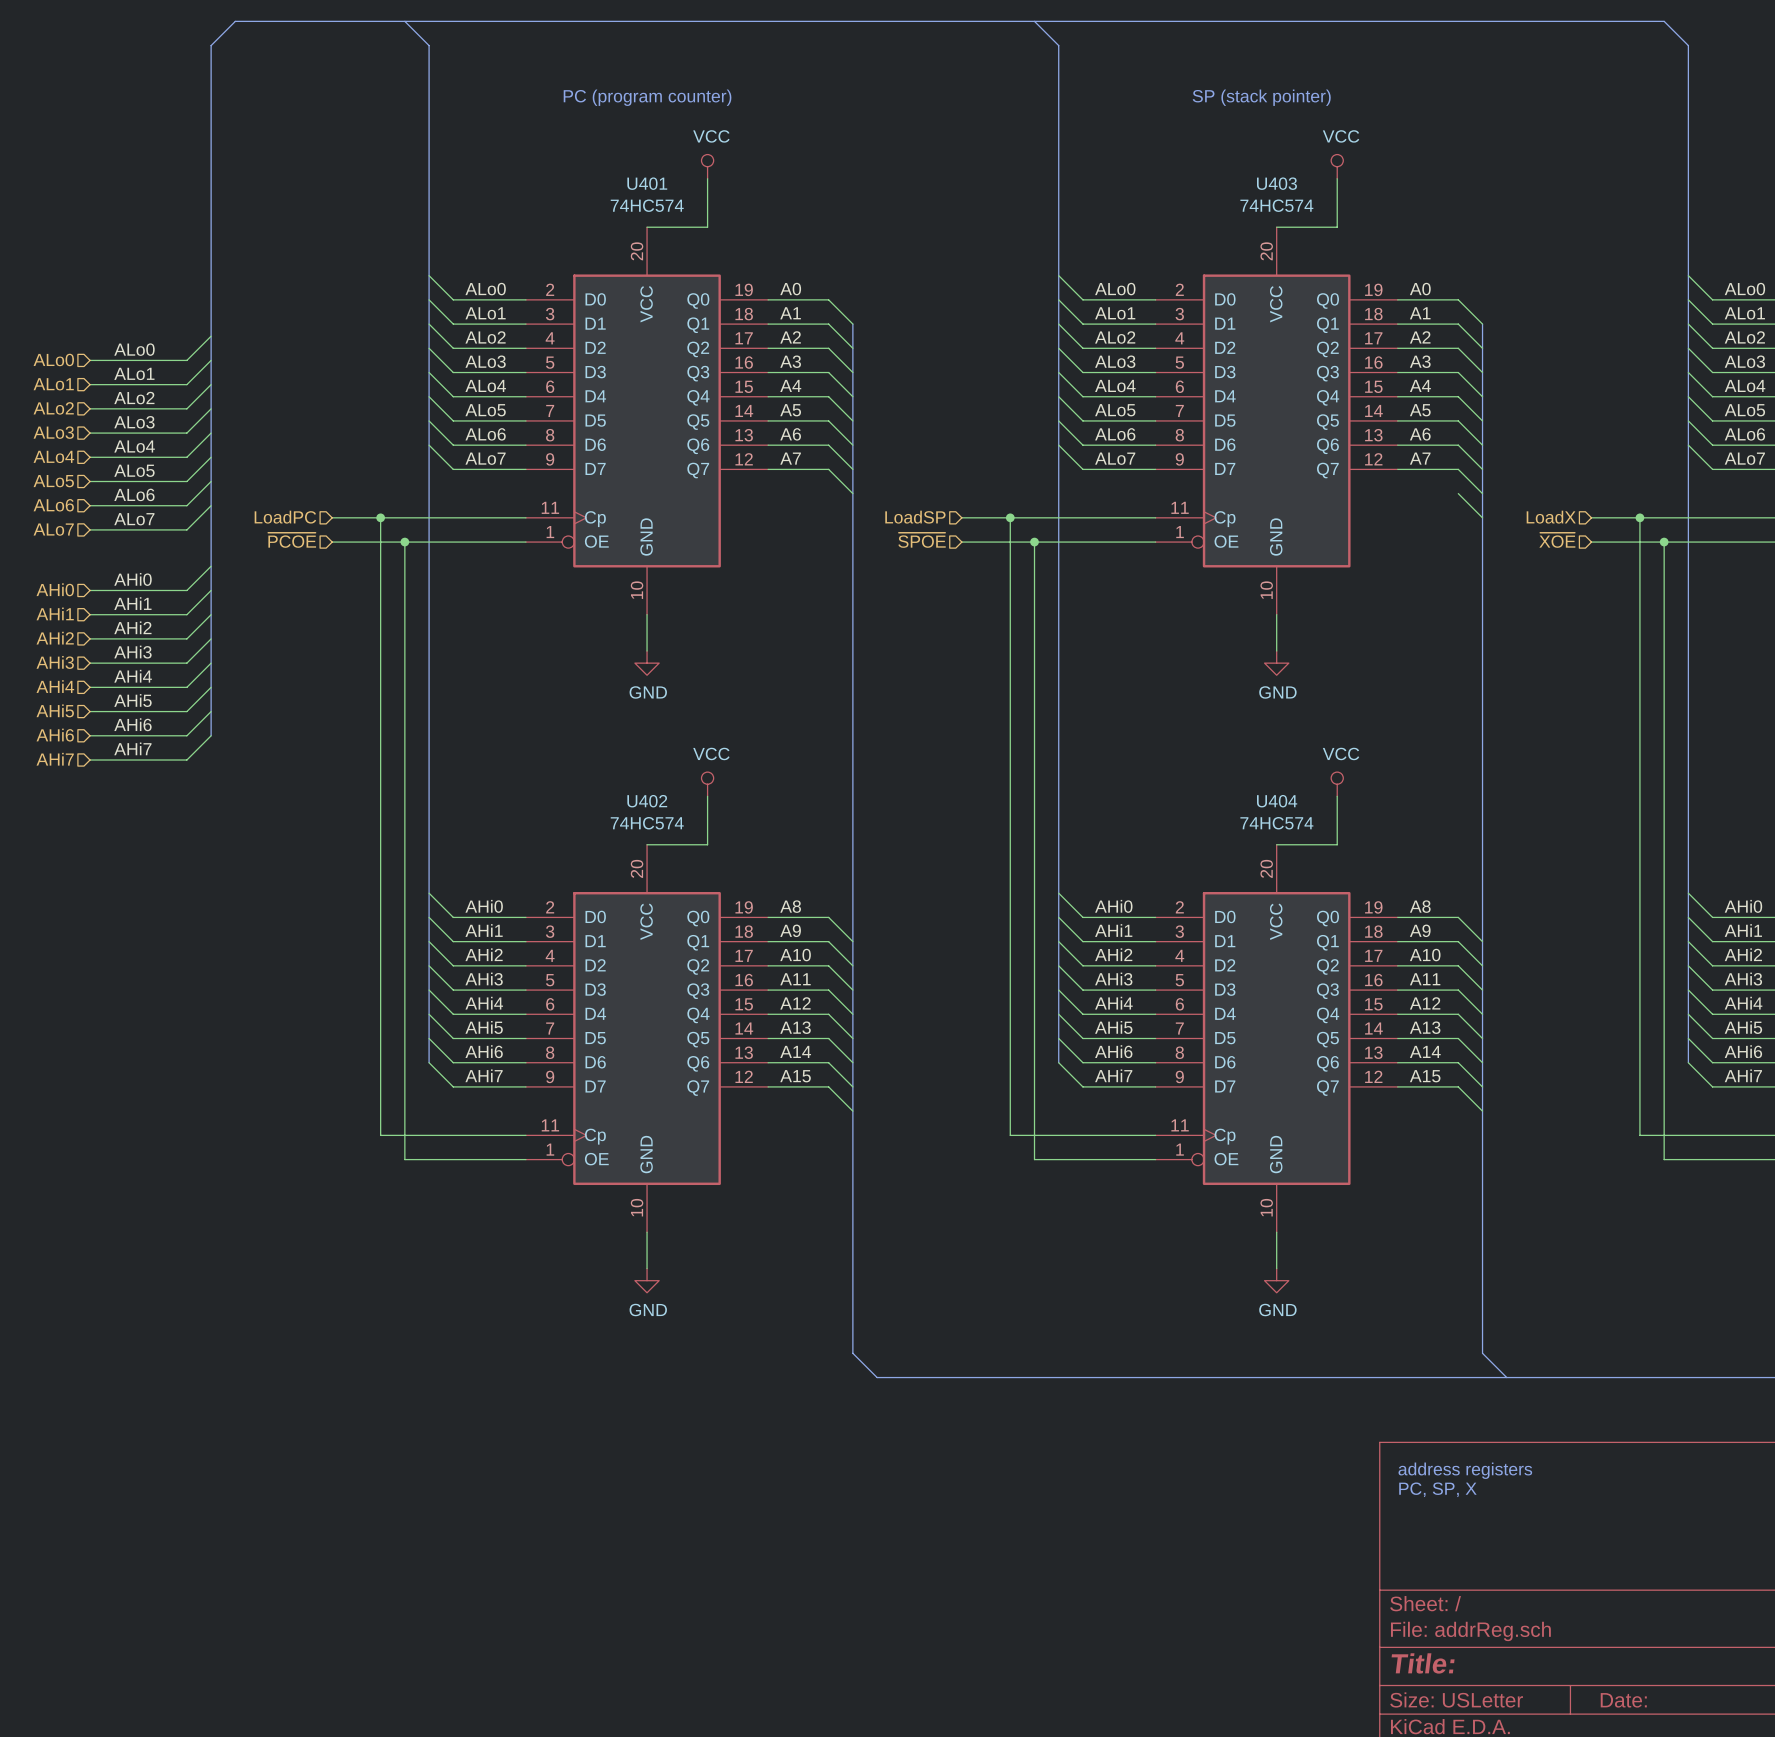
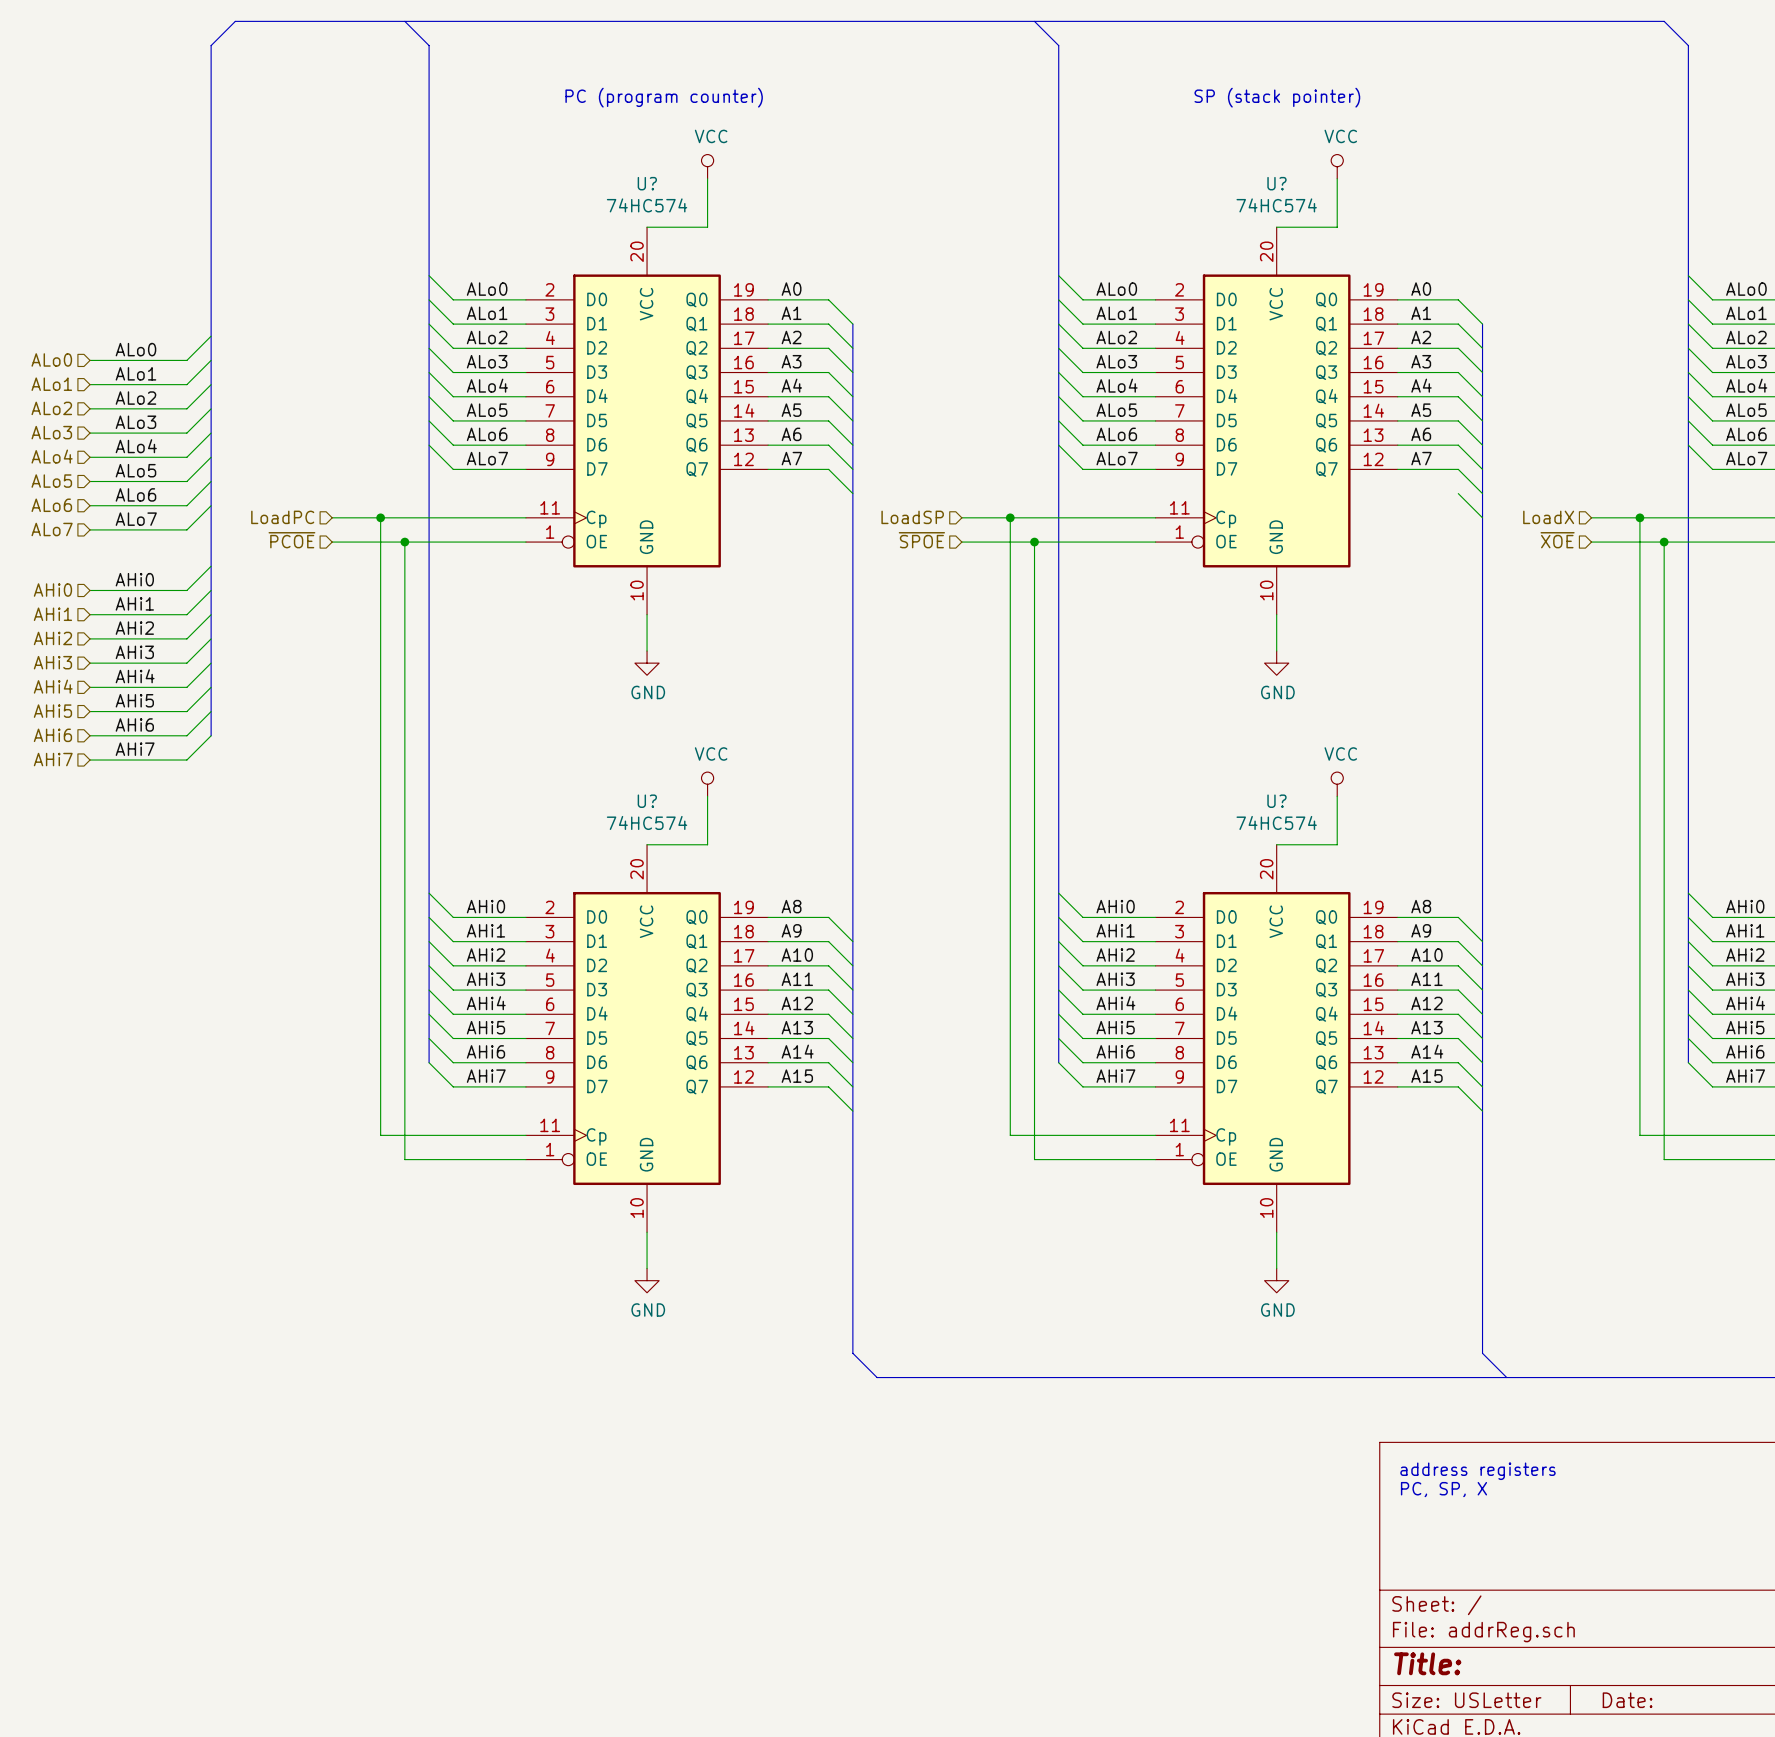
U401 name: U401 (647, 183) -> U? (647, 183)
U403 name: U403 (1276, 183) -> U? (1276, 183)
U402 name: U402 (647, 801) -> U? (647, 801)
U404 name: U404 (1277, 801) -> U? (1276, 801)

